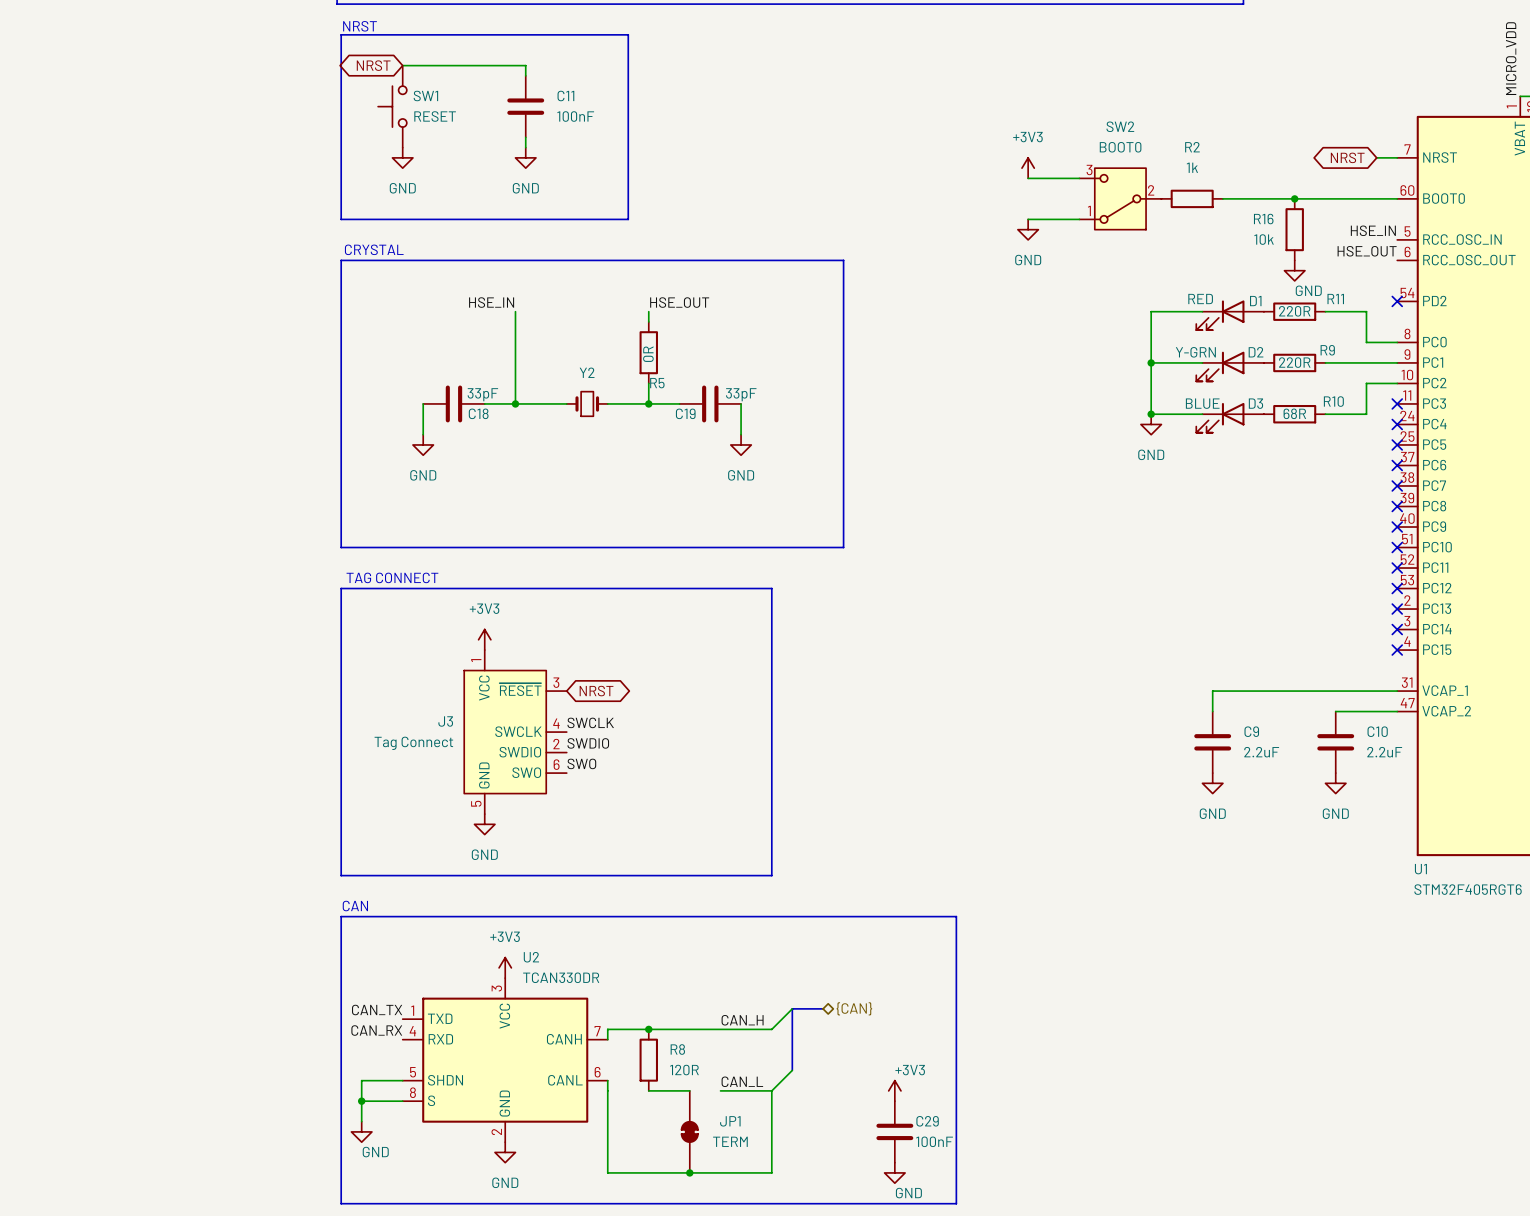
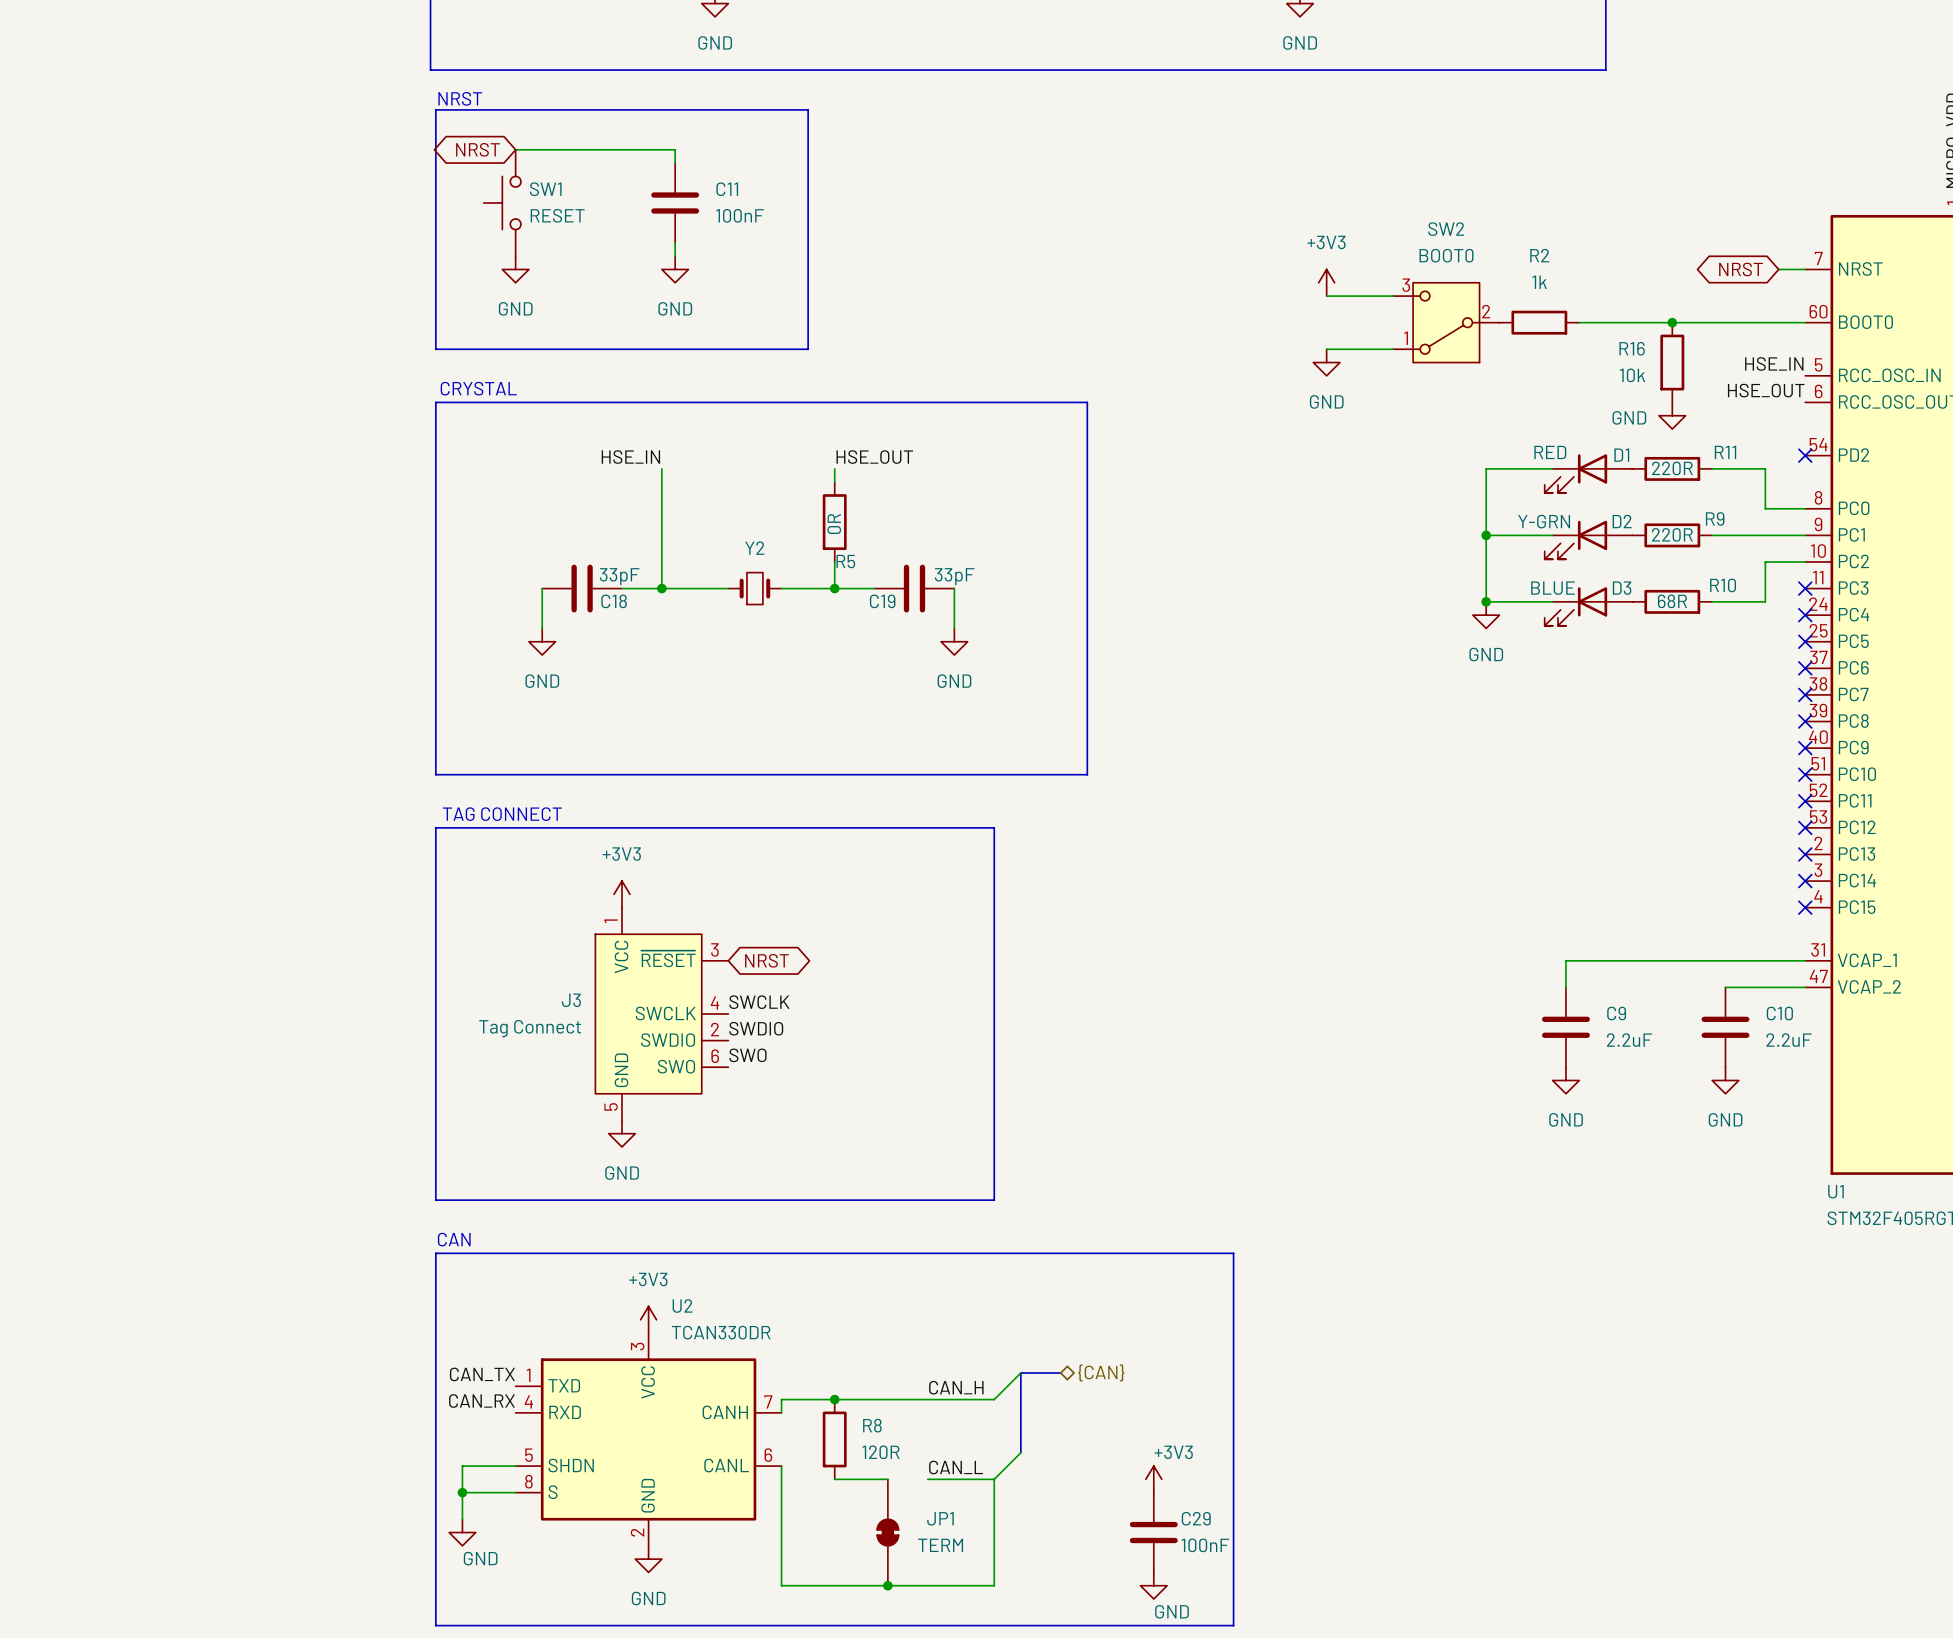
power symbol text position: GND (1308, 290) -> GND (1629, 417)

